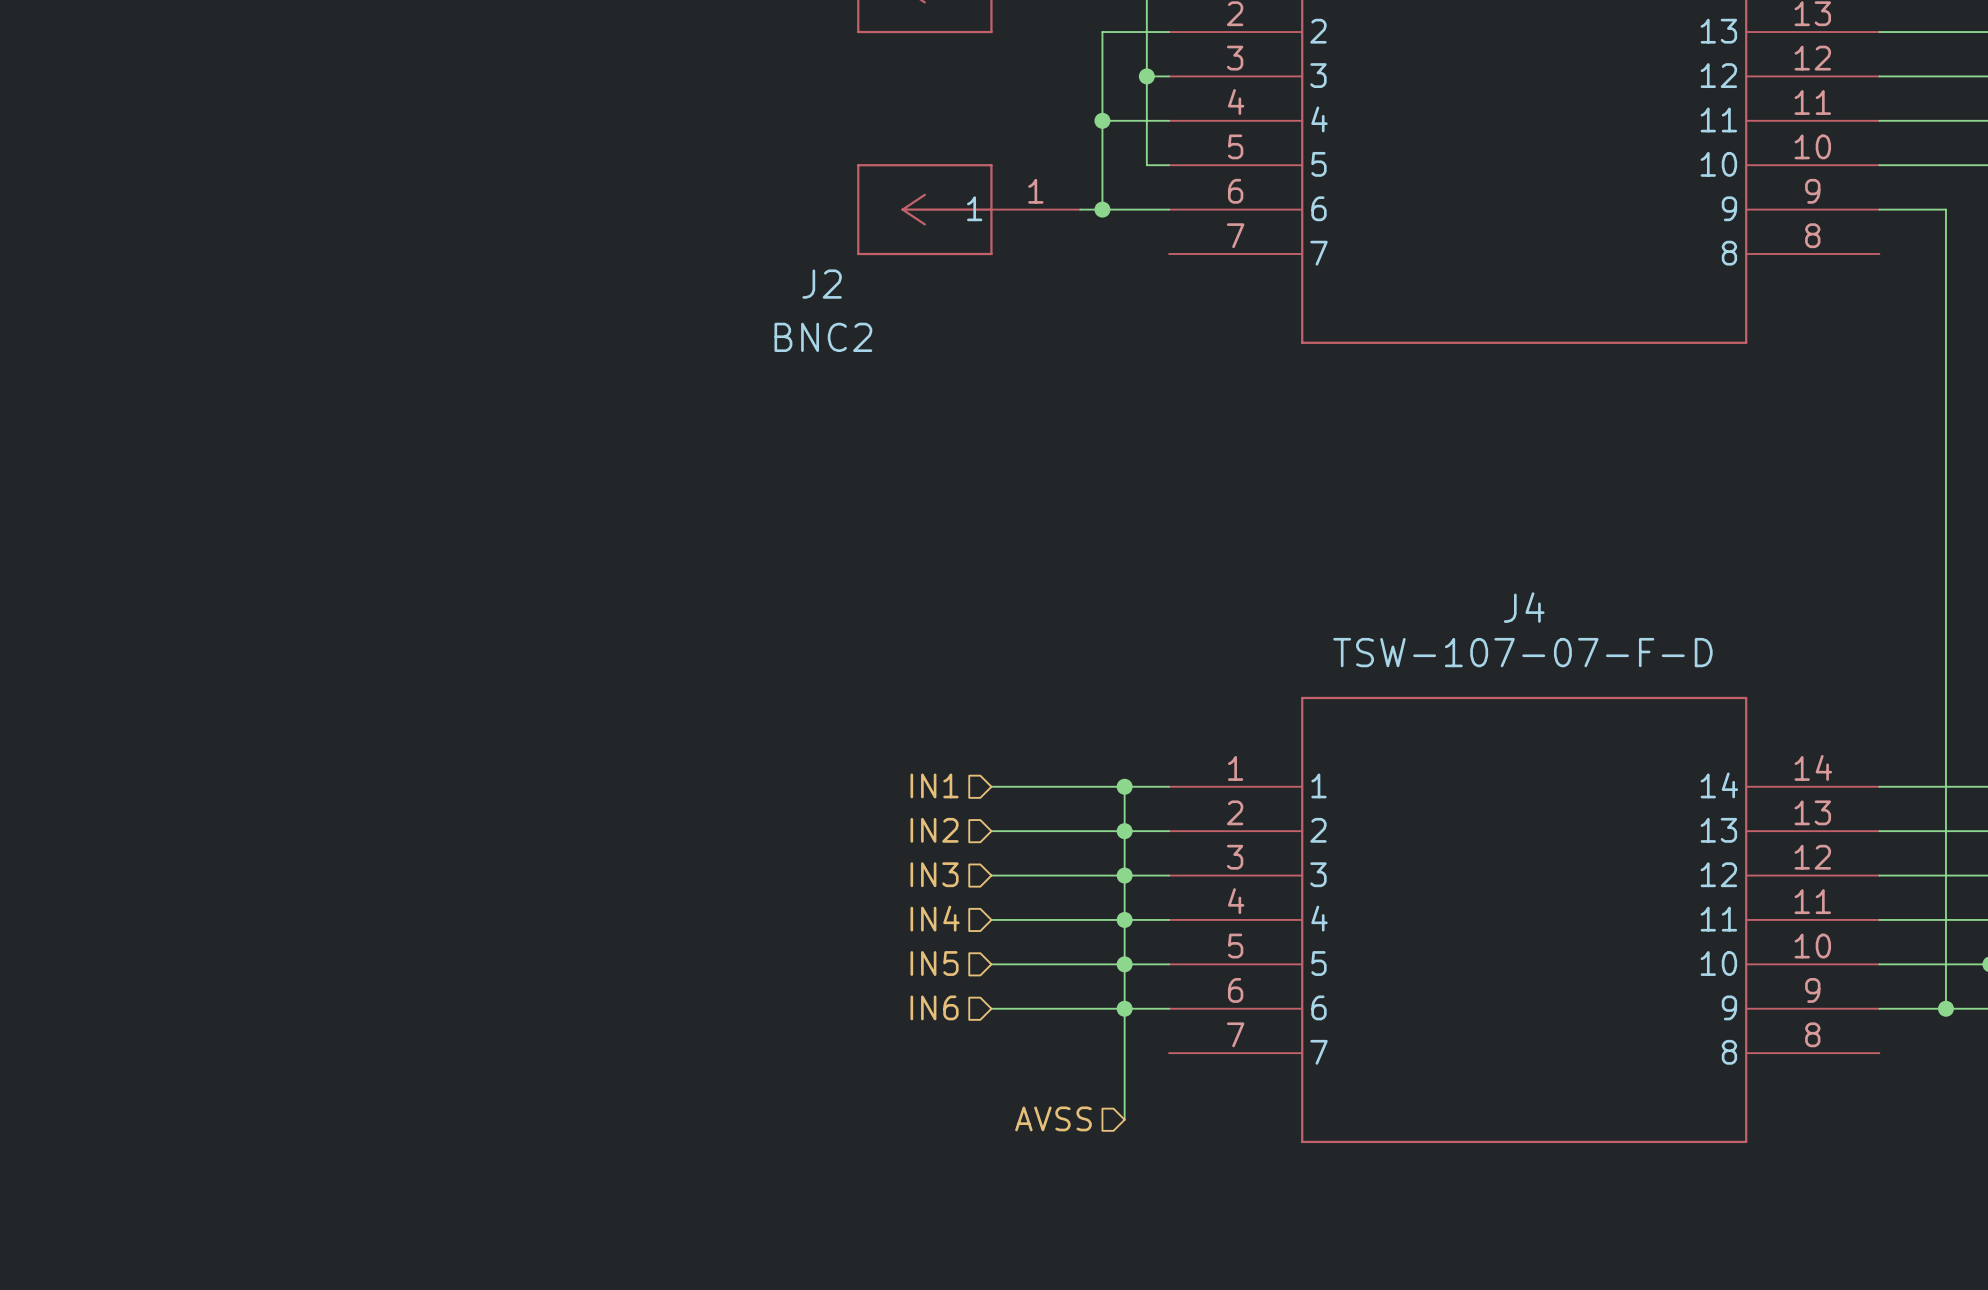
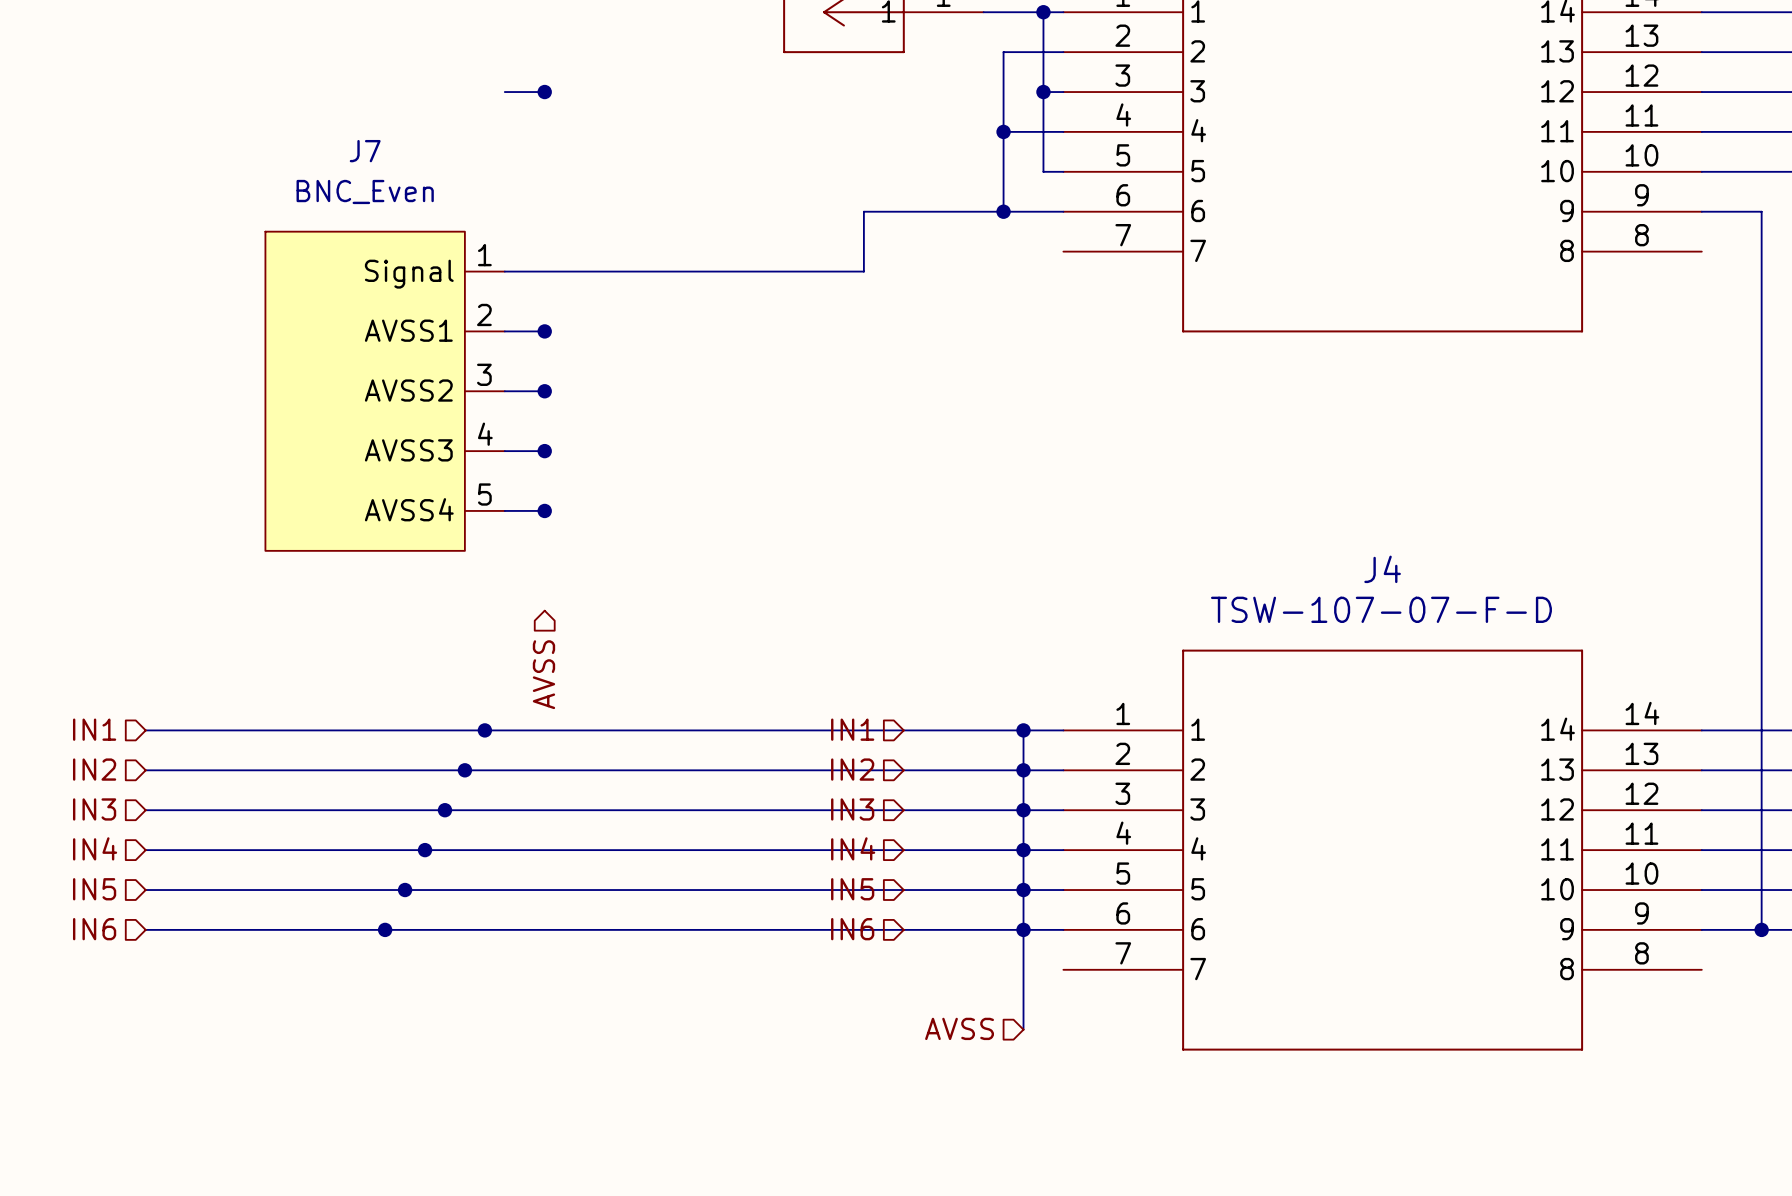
wire: none -> (504, 92) (544, 92)
junction: none -> (544, 92)
J2: BNC2 (968, 209) -> none
wire: none -> (983, 211) (863, 211) (863, 271) (504, 271)
wire: none -> (504, 331) (544, 331)
junction: none -> (544, 331)
J7: none -> BNC_Even (385, 391)
wire: none -> (504, 391) (544, 391)
junction: none -> (544, 391)
wire: none -> (504, 451) (544, 451)
junction: none -> (544, 451)
wire: none -> (504, 510) (544, 510)
junction: none -> (544, 510)
hierarchical label: none -> AVSS (543, 674)
hierarchical label: none -> IN1 (94, 729)
wire: none -> (145, 730) (903, 730)
junction: none -> (484, 730)
hierarchical label: none -> IN2 (94, 769)
wire: none -> (145, 770) (903, 770)
junction: none -> (464, 770)
hierarchical label: none -> IN3 (94, 809)
wire: none -> (145, 810) (903, 810)
junction: none -> (444, 810)
hierarchical label: none -> IN4 (95, 848)
wire: none -> (145, 850) (903, 850)
junction: none -> (425, 850)
hierarchical label: none -> IN5 (94, 889)
wire: none -> (145, 890) (903, 890)
junction: none -> (405, 890)
hierarchical label: none -> IN6 (94, 929)
wire: none -> (145, 929) (903, 929)
junction: none -> (385, 929)

